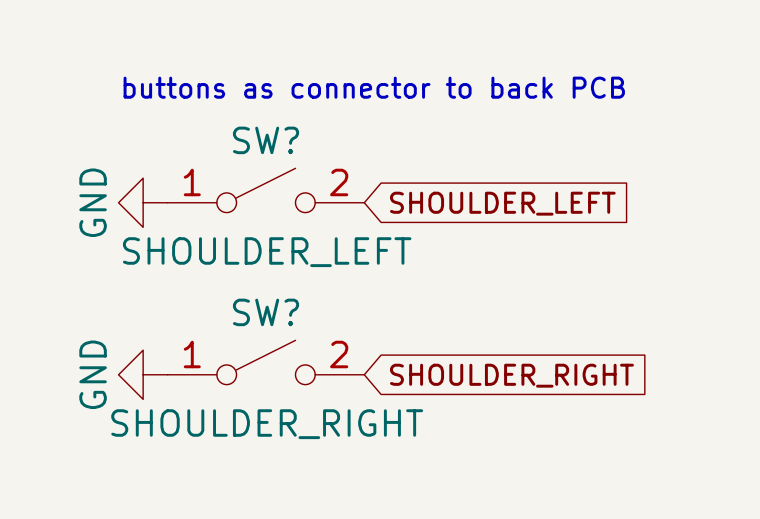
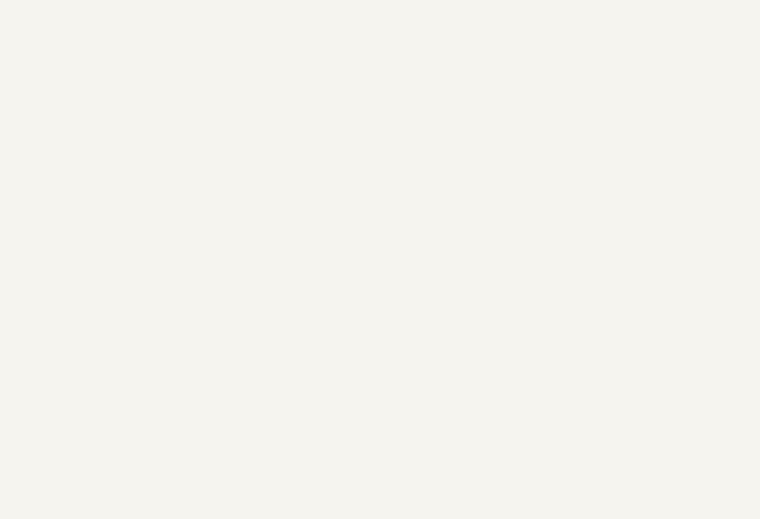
text: buttons as connector to back PCB (374, 87) -> none
SW?: SHOULDER_LEFT (266, 190) -> none
power symbol: GND (143, 202) -> none
global label: SHOULDER_LEFT (502, 203) -> none
SW?: SHOULDER_RIGHT (266, 362) -> none
power symbol: GND (143, 374) -> none
global label: SHOULDER_RIGHT (511, 375) -> none

